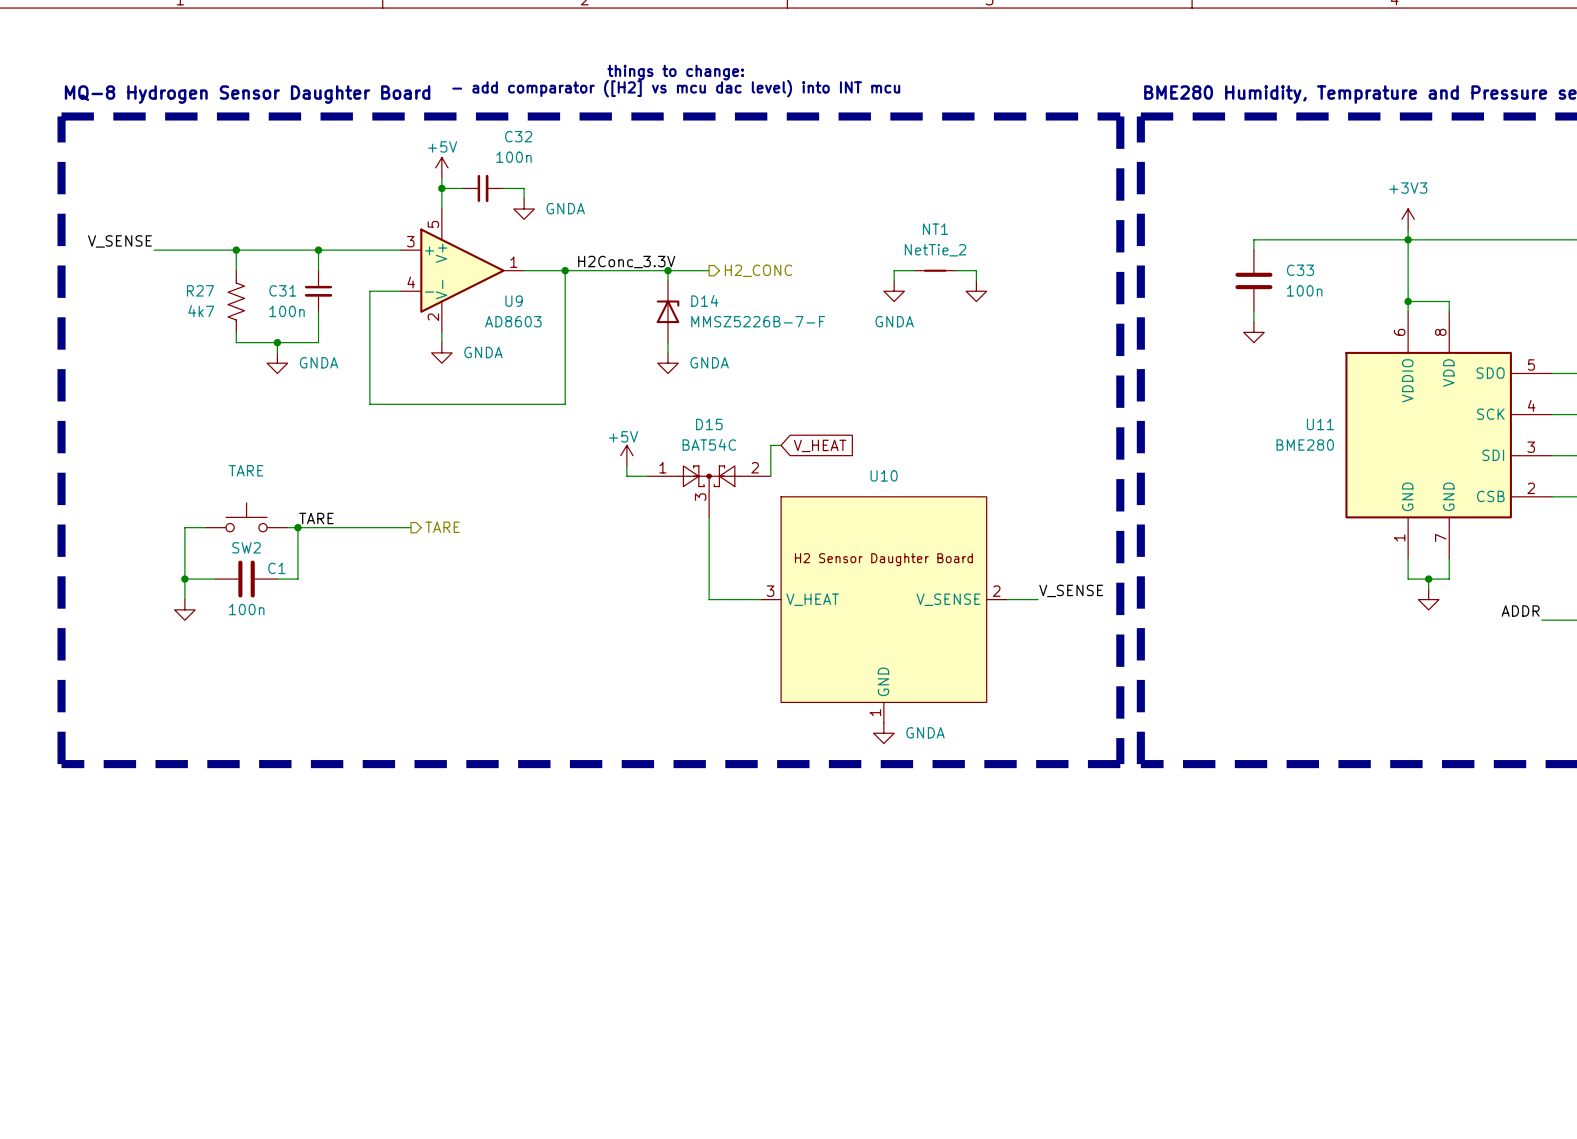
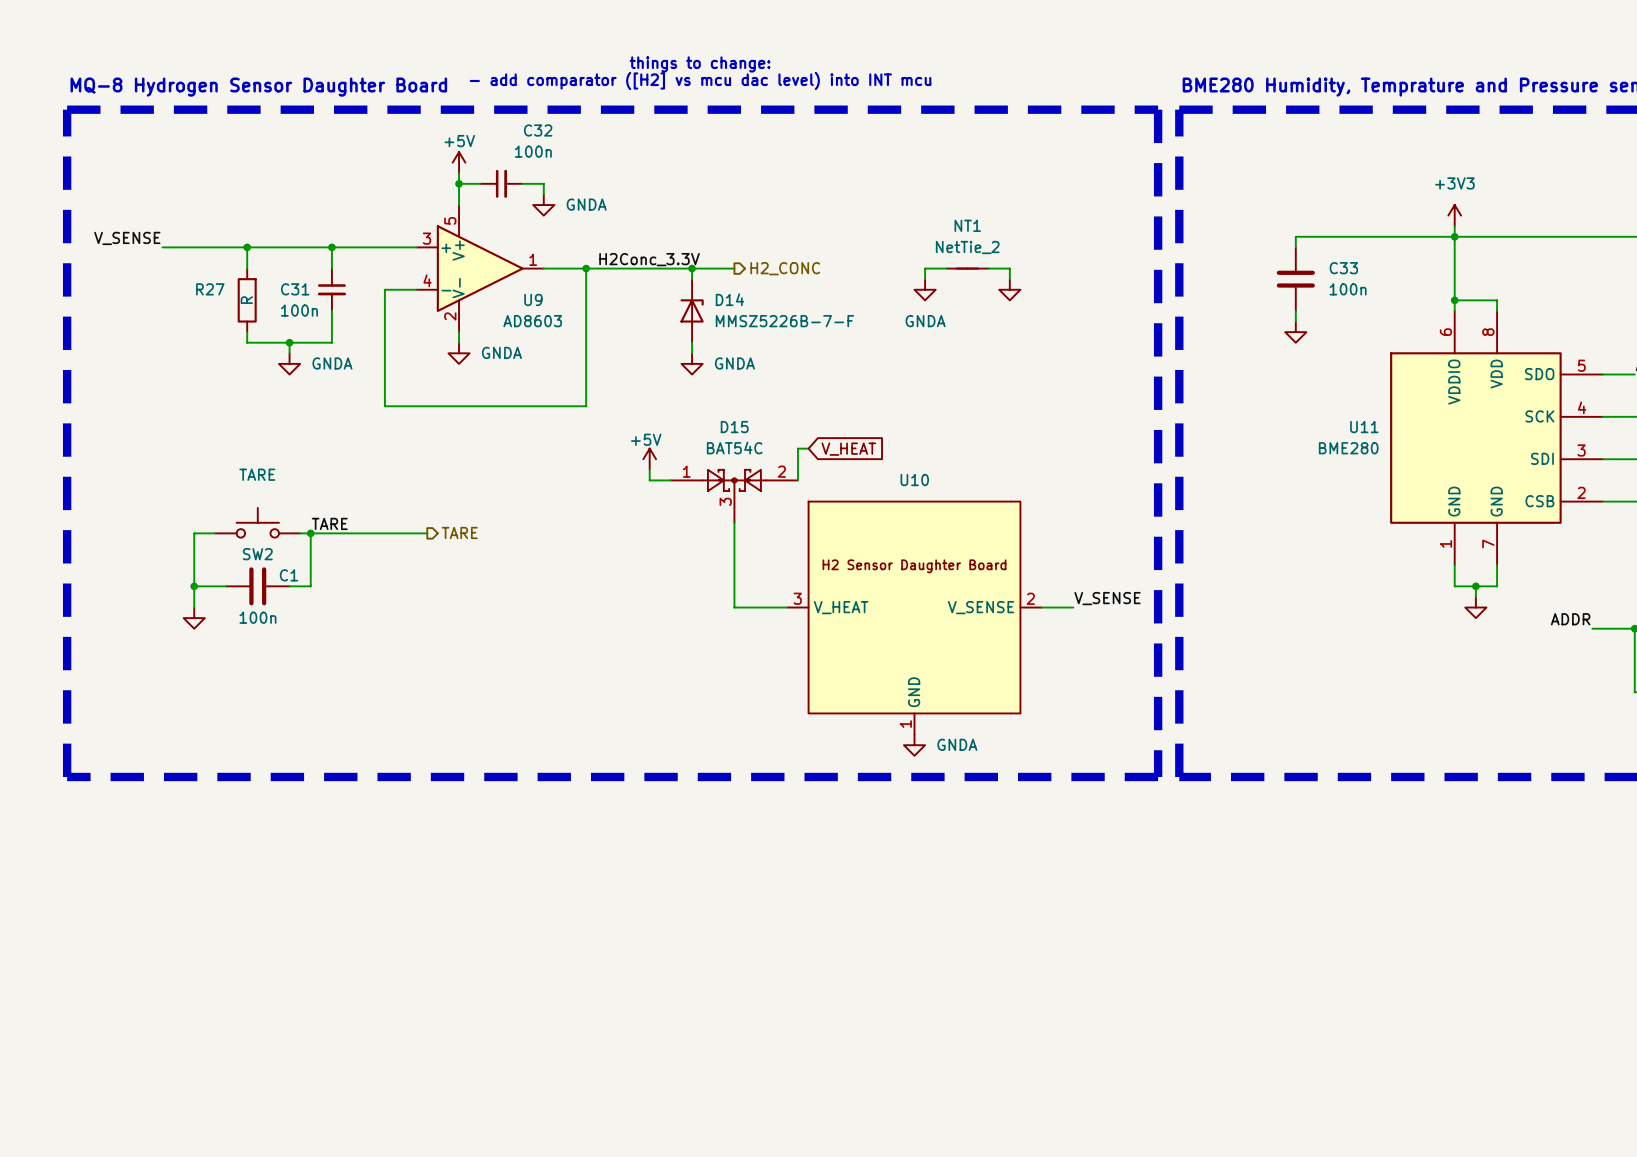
R27 symbol: [228, 270, 245, 333] -> [237, 268, 257, 333]
R27 value: 4k7 (201, 311) -> R (246, 300)

